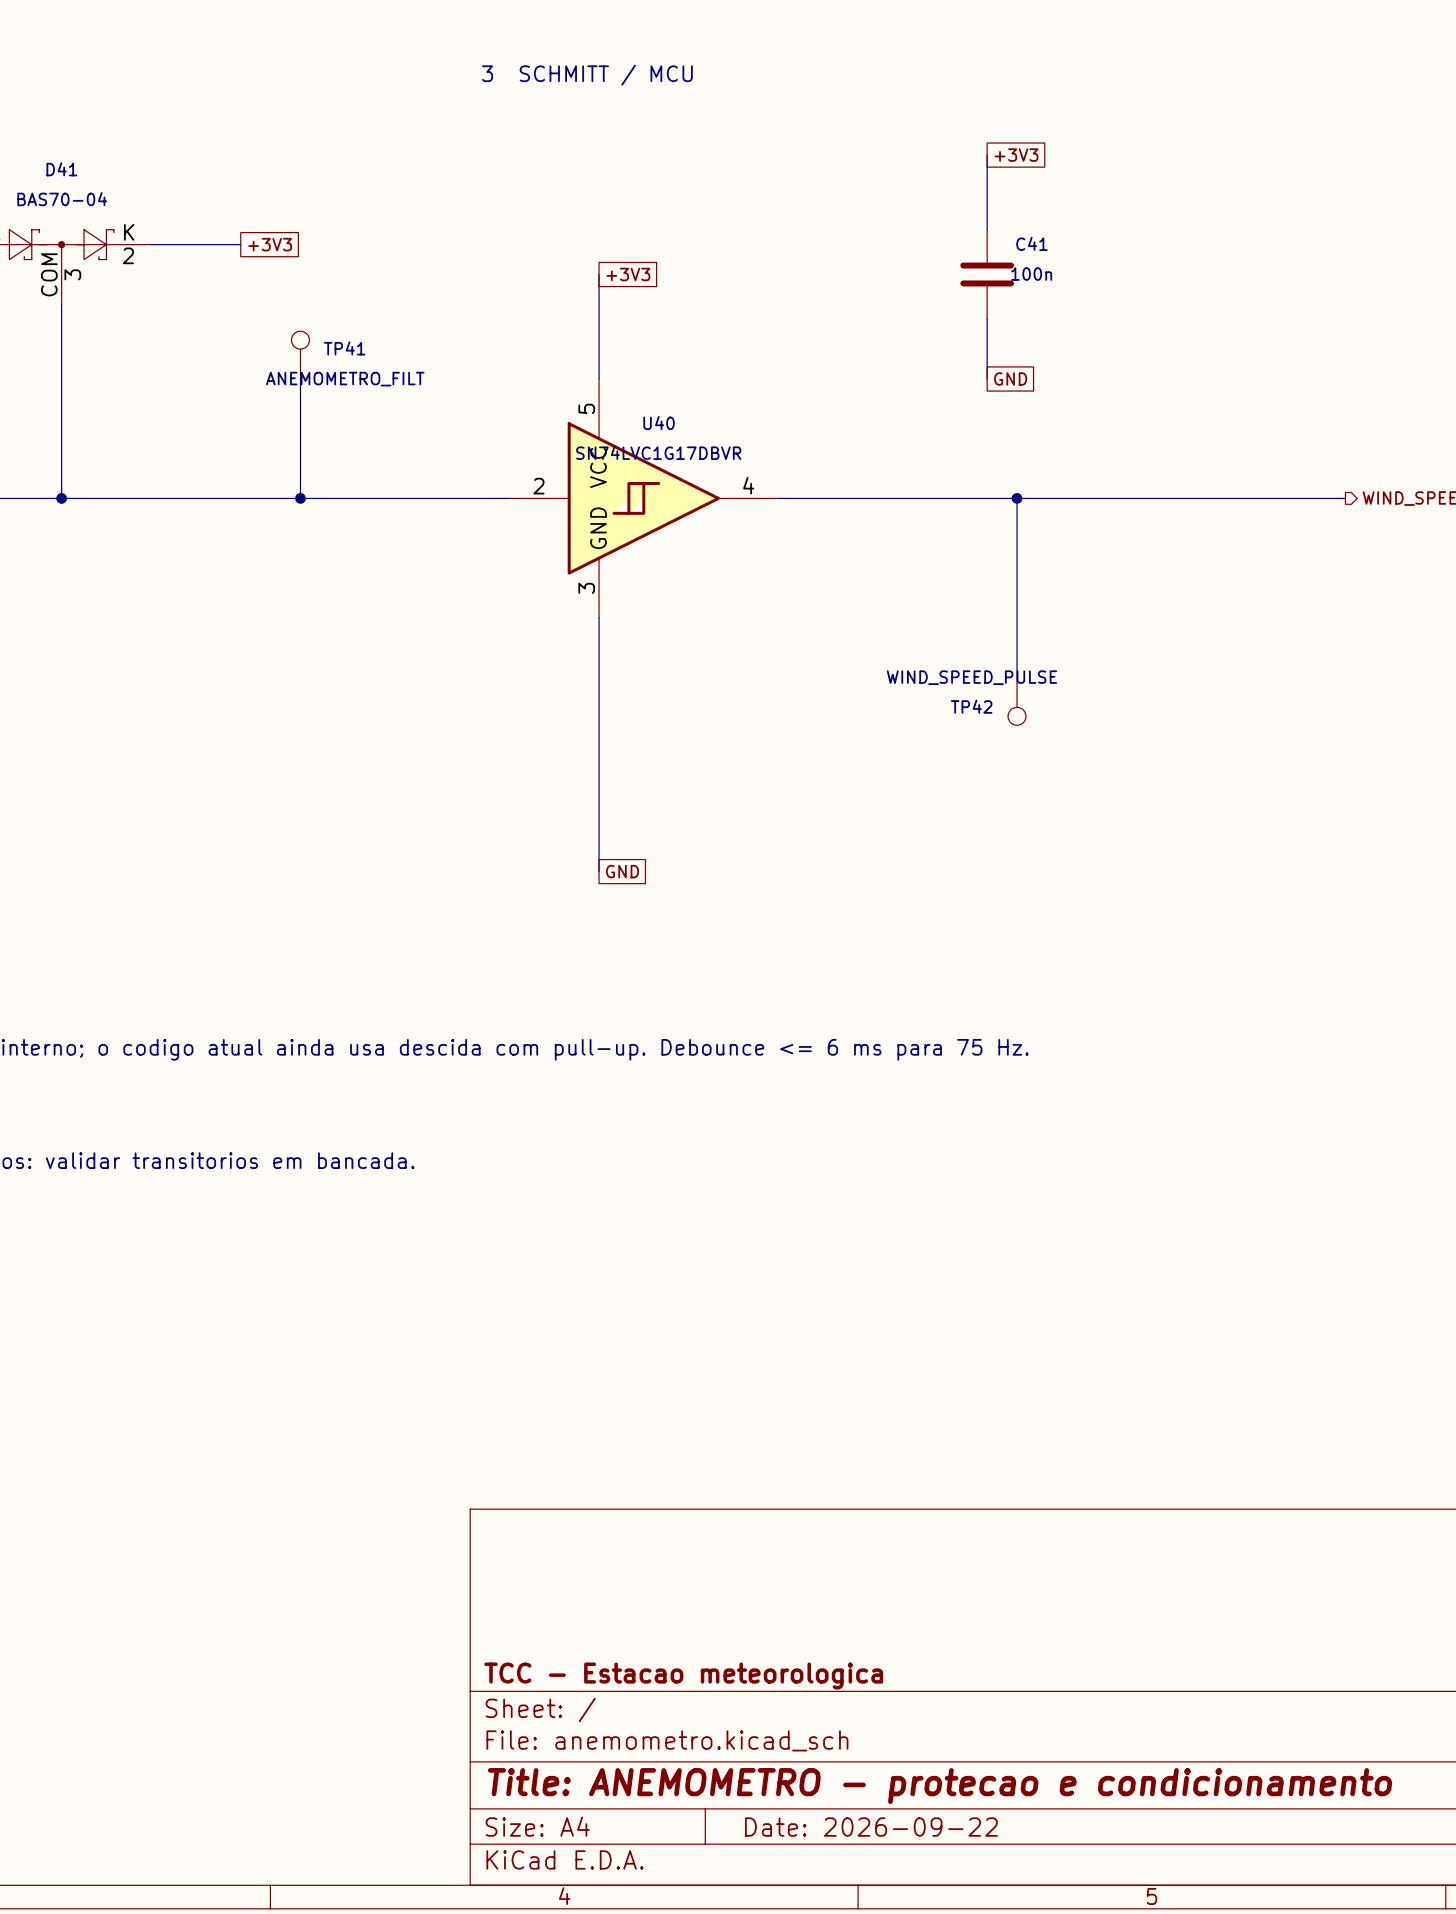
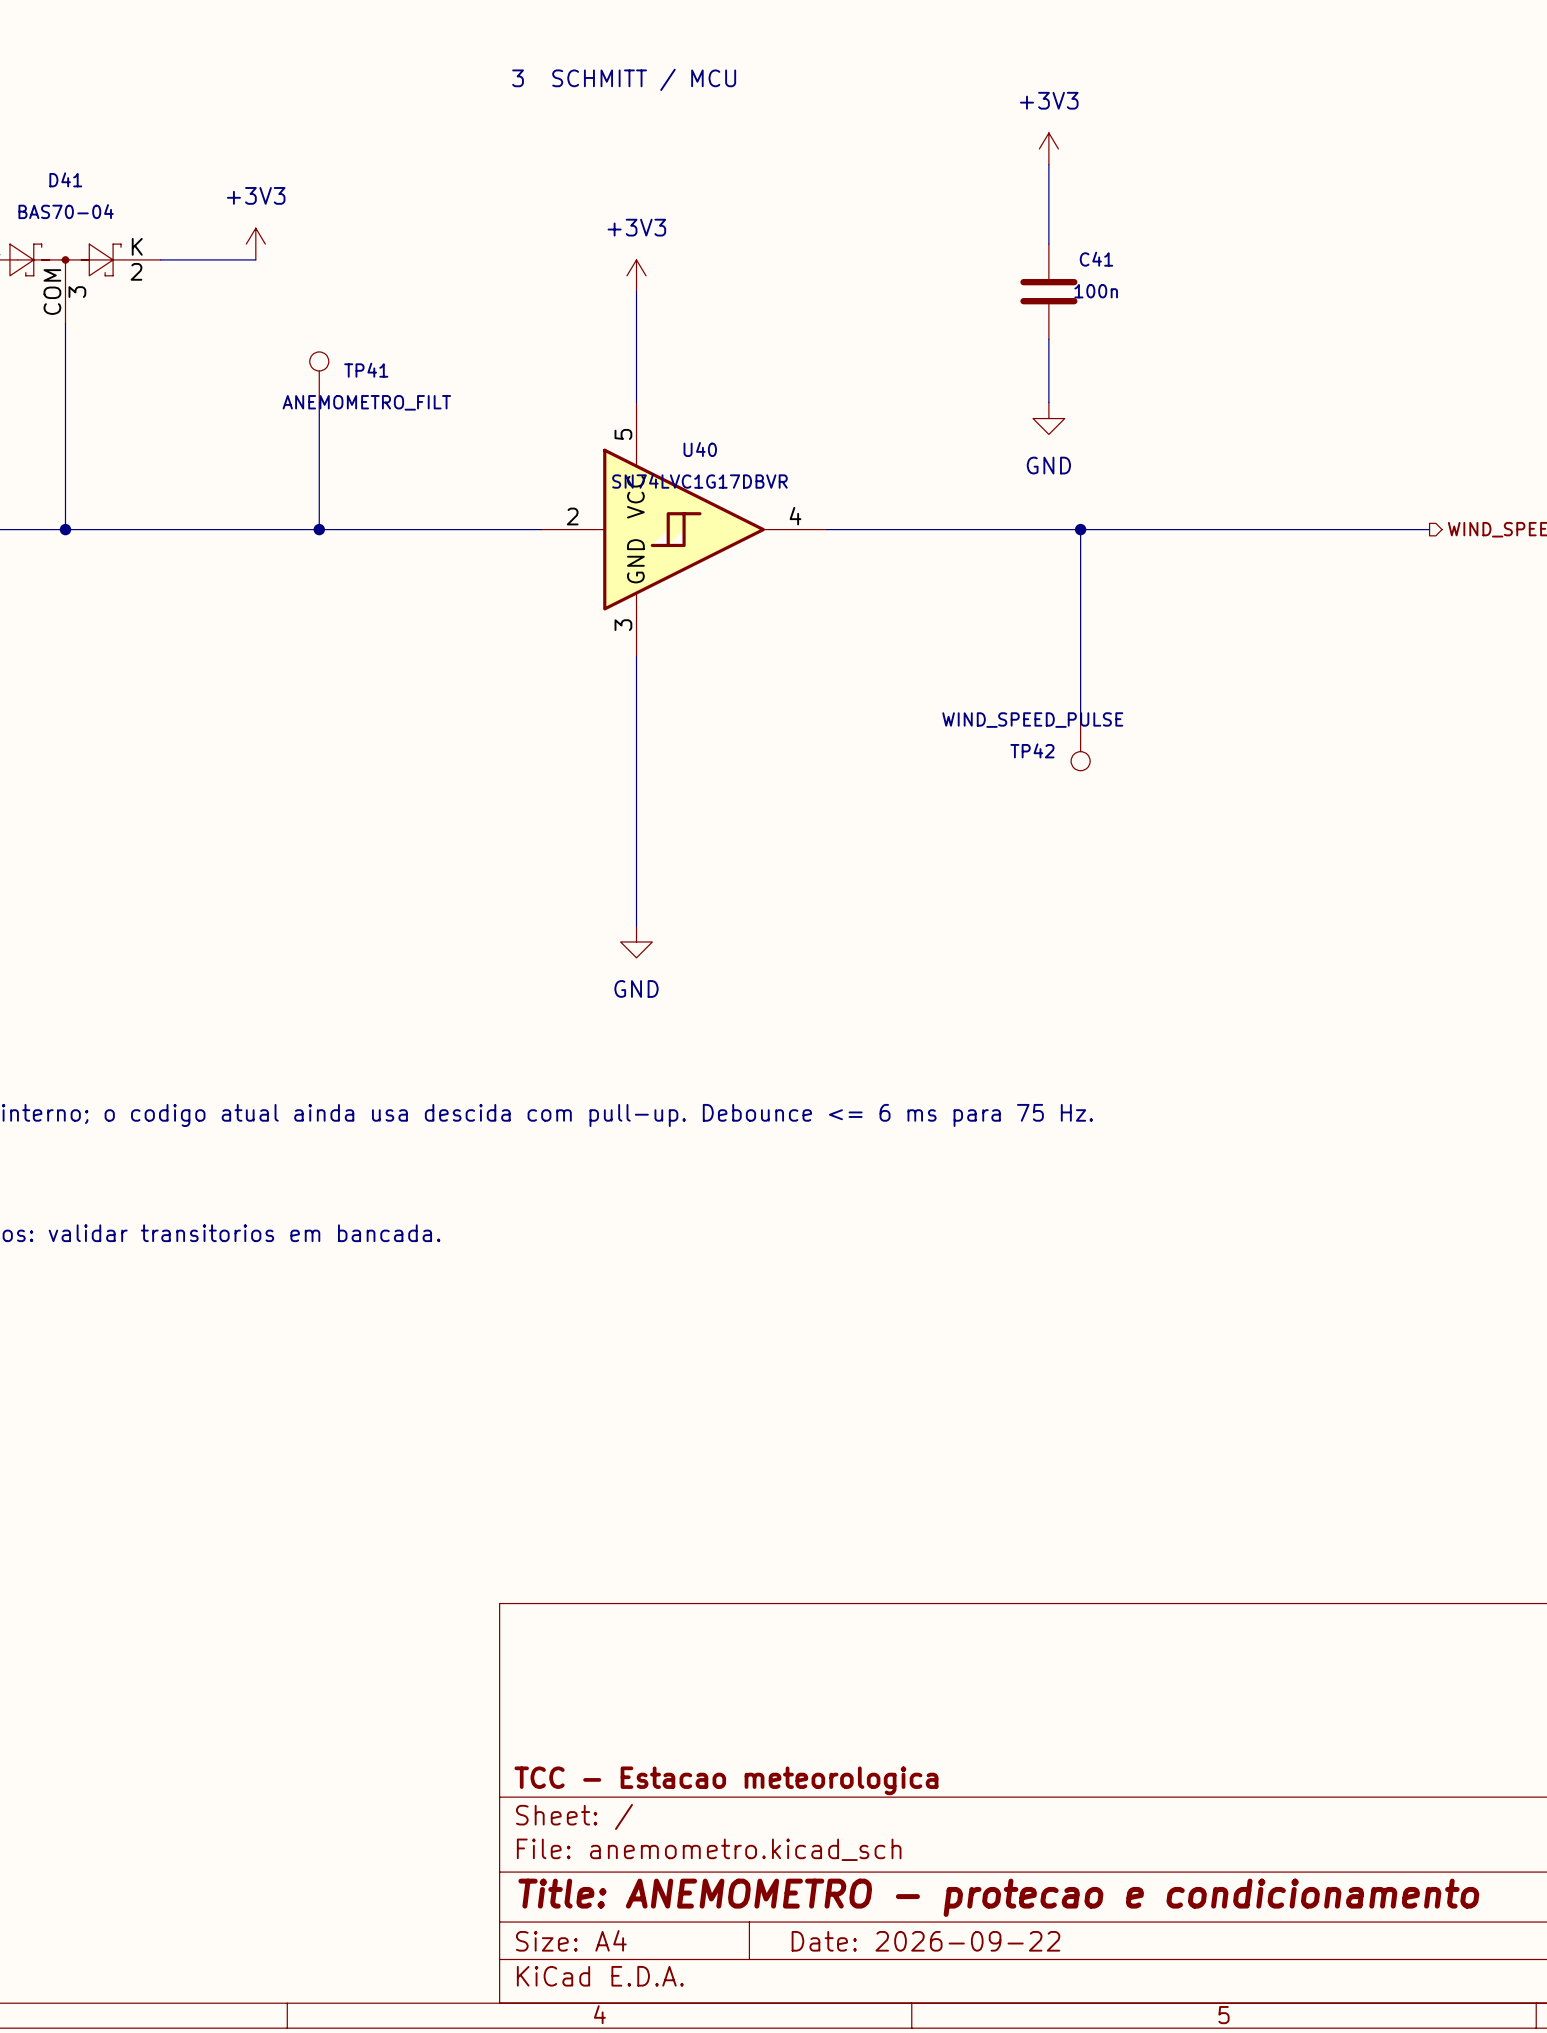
power symbol: none -> +3V3 (1048, 148)
global label: +3V3 (1016, 155) -> none
power symbol: none -> +3V3 (255, 244)
global label: +3V3 (270, 244) -> none
power symbol: none -> +3V3 (636, 275)
global label: +3V3 (628, 274) -> none
global label: GND (1010, 378) -> none
power symbol: none -> GND (1048, 418)
global label: GND (622, 871) -> none
power symbol: none -> GND (636, 941)

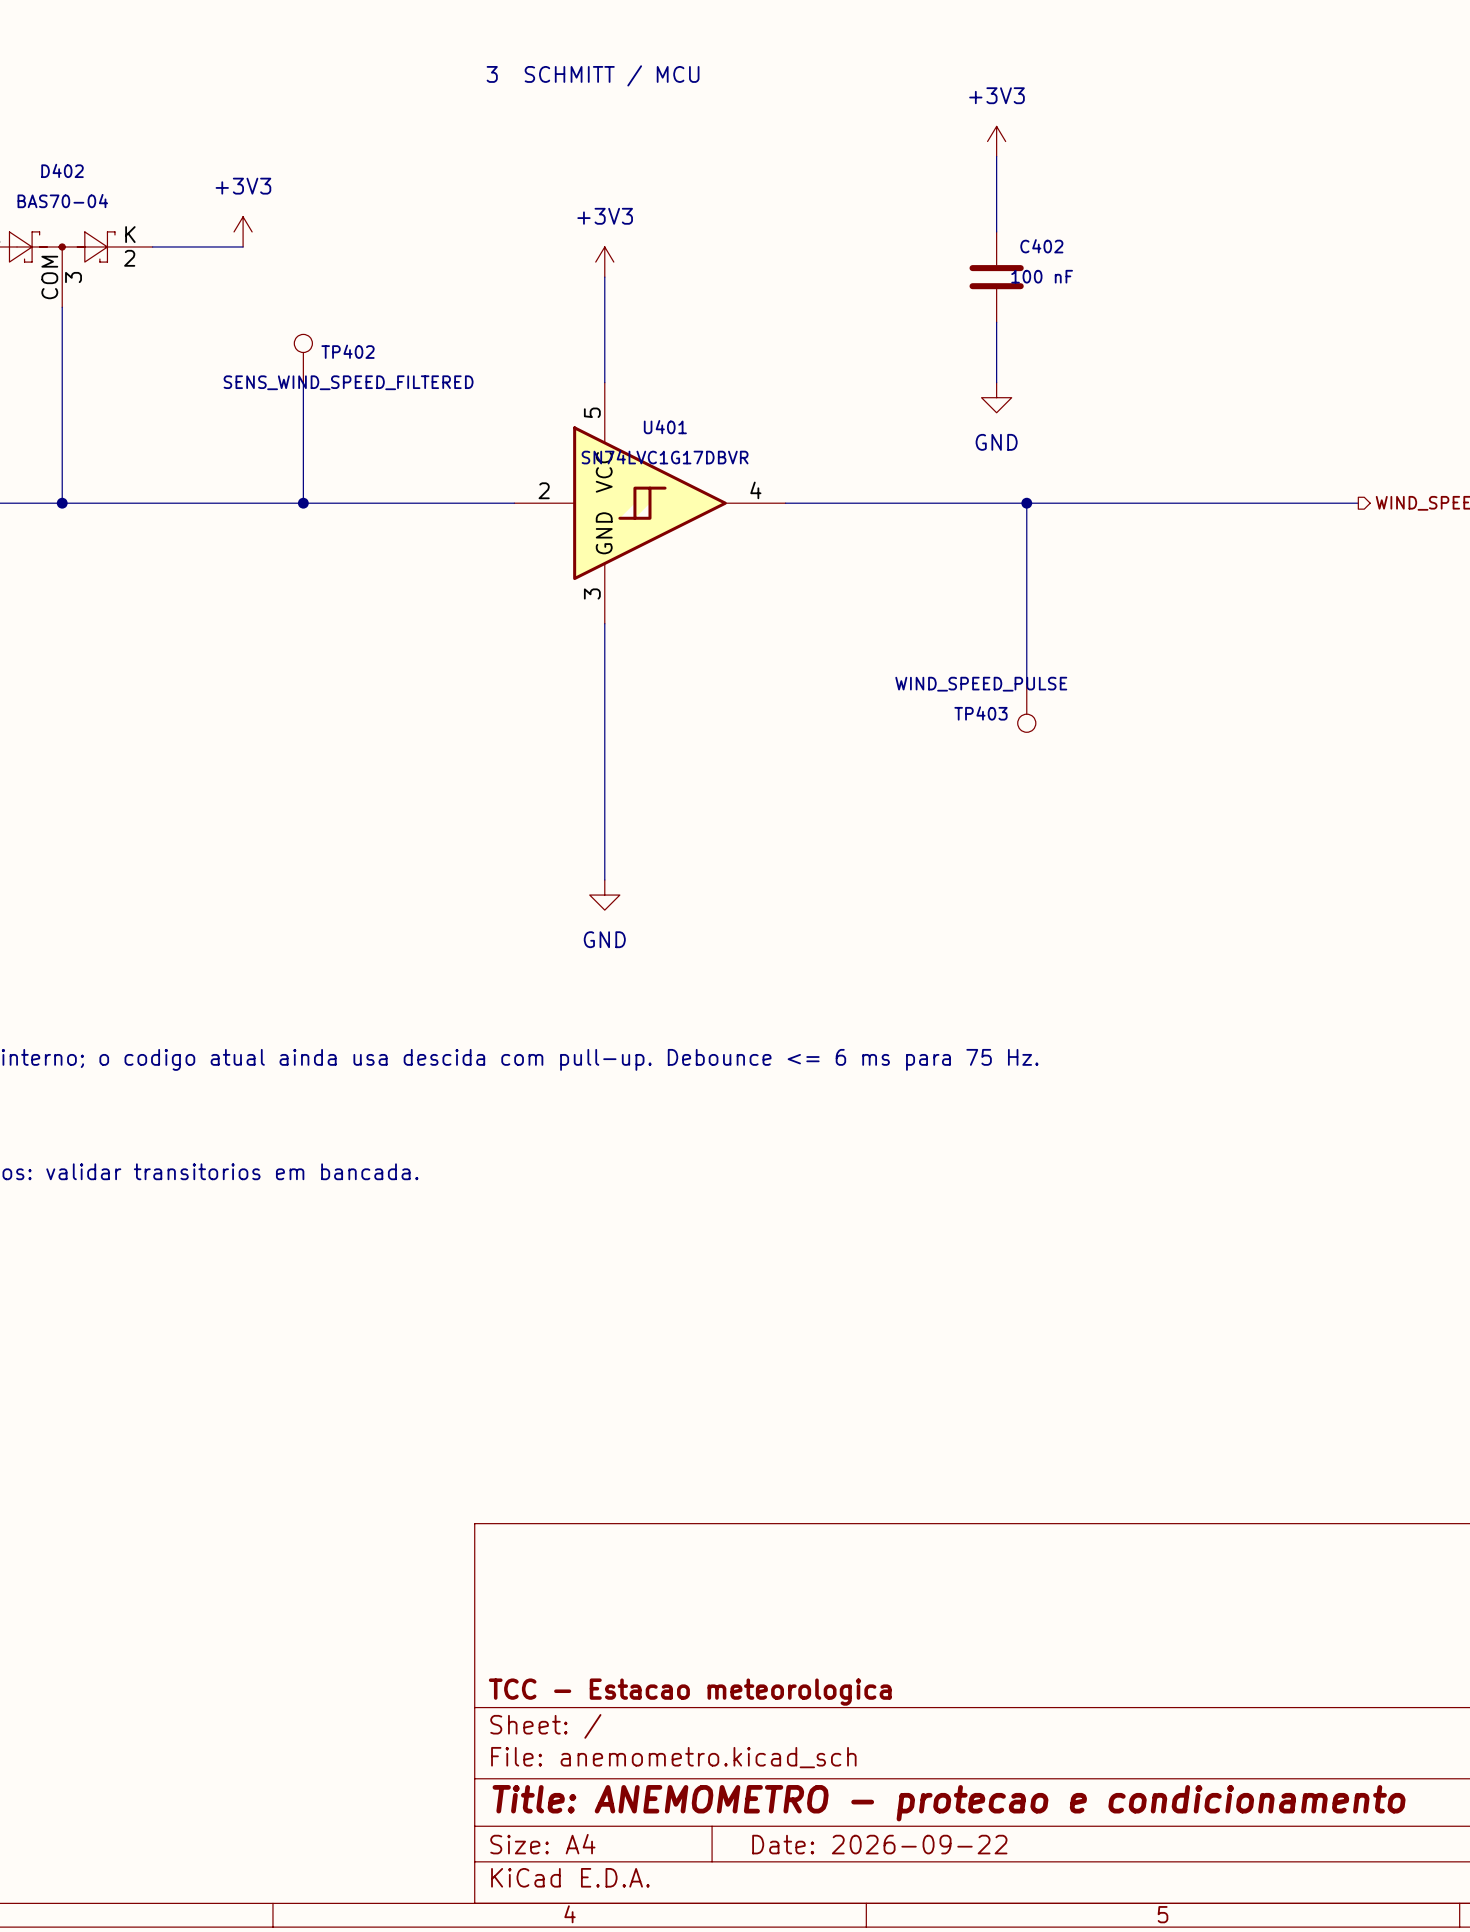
D41 name: D41 (65, 179) -> D402 (62, 170)
C41 name: C41 (1096, 259) -> C402 (1041, 246)
C41 value: 100n (1096, 291) -> 100 nF (1042, 276)
TP41 name: TP41 (366, 370) -> TP402 (348, 351)
TP41 value: ANEMOMETRO_FILT (366, 402) -> SENS_WIND_SPEED_FILTERED (348, 382)
U40 name: U40 (700, 449) -> U401 (665, 427)
TP42 name: TP42 (1032, 750) -> TP403 (980, 713)

